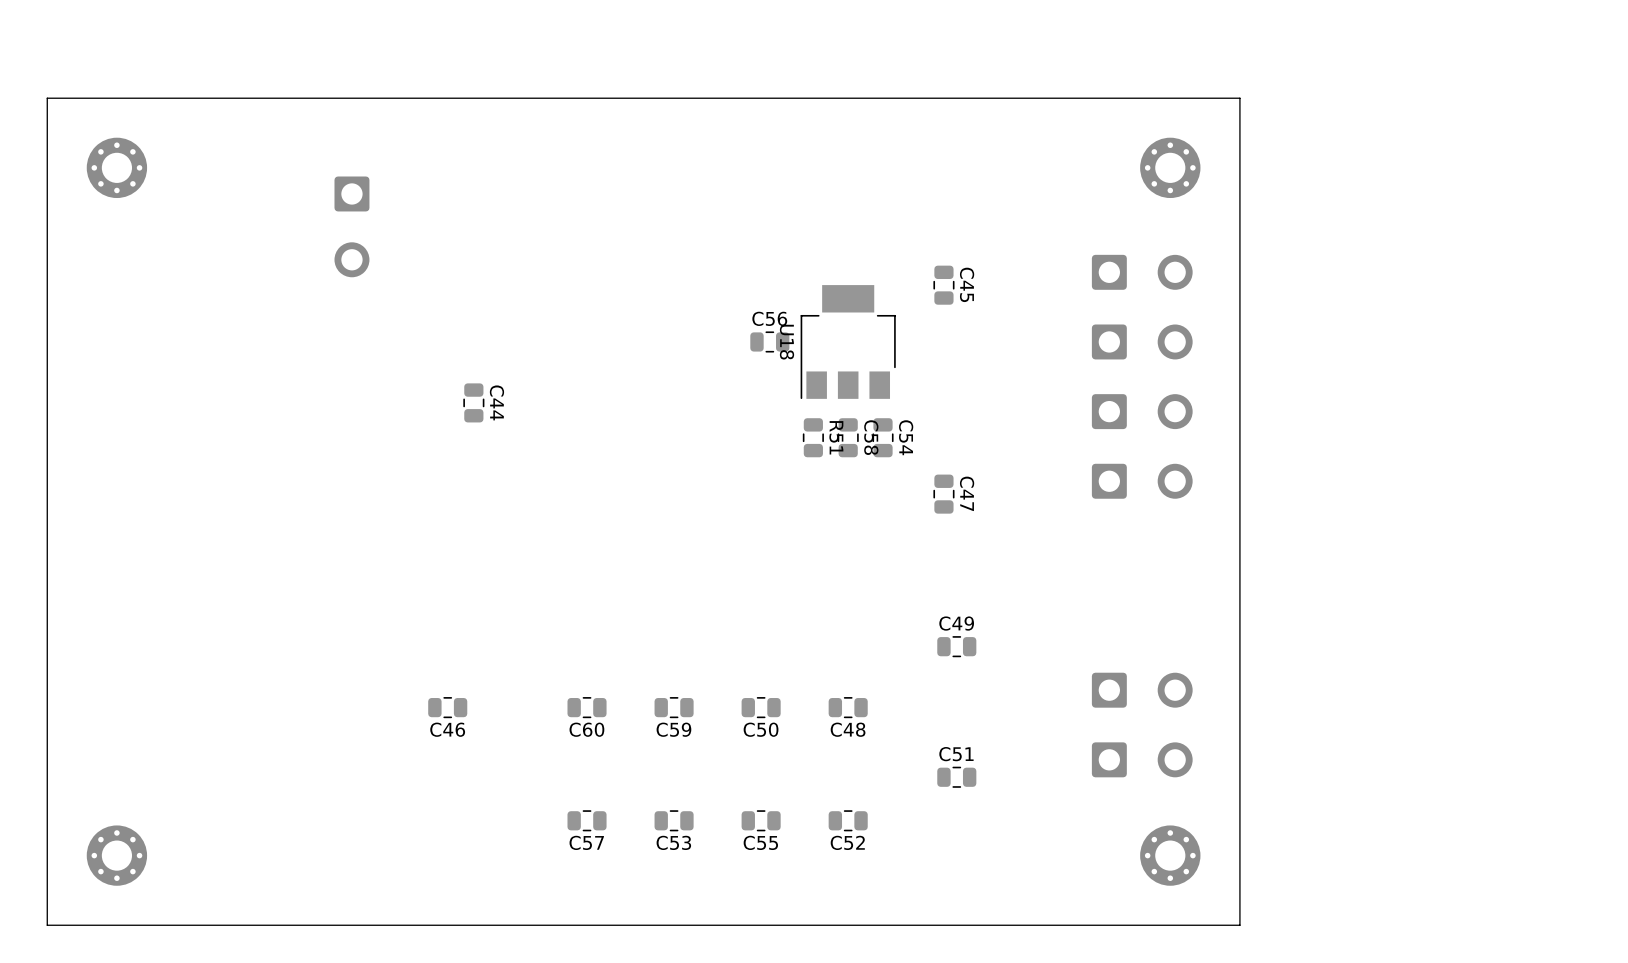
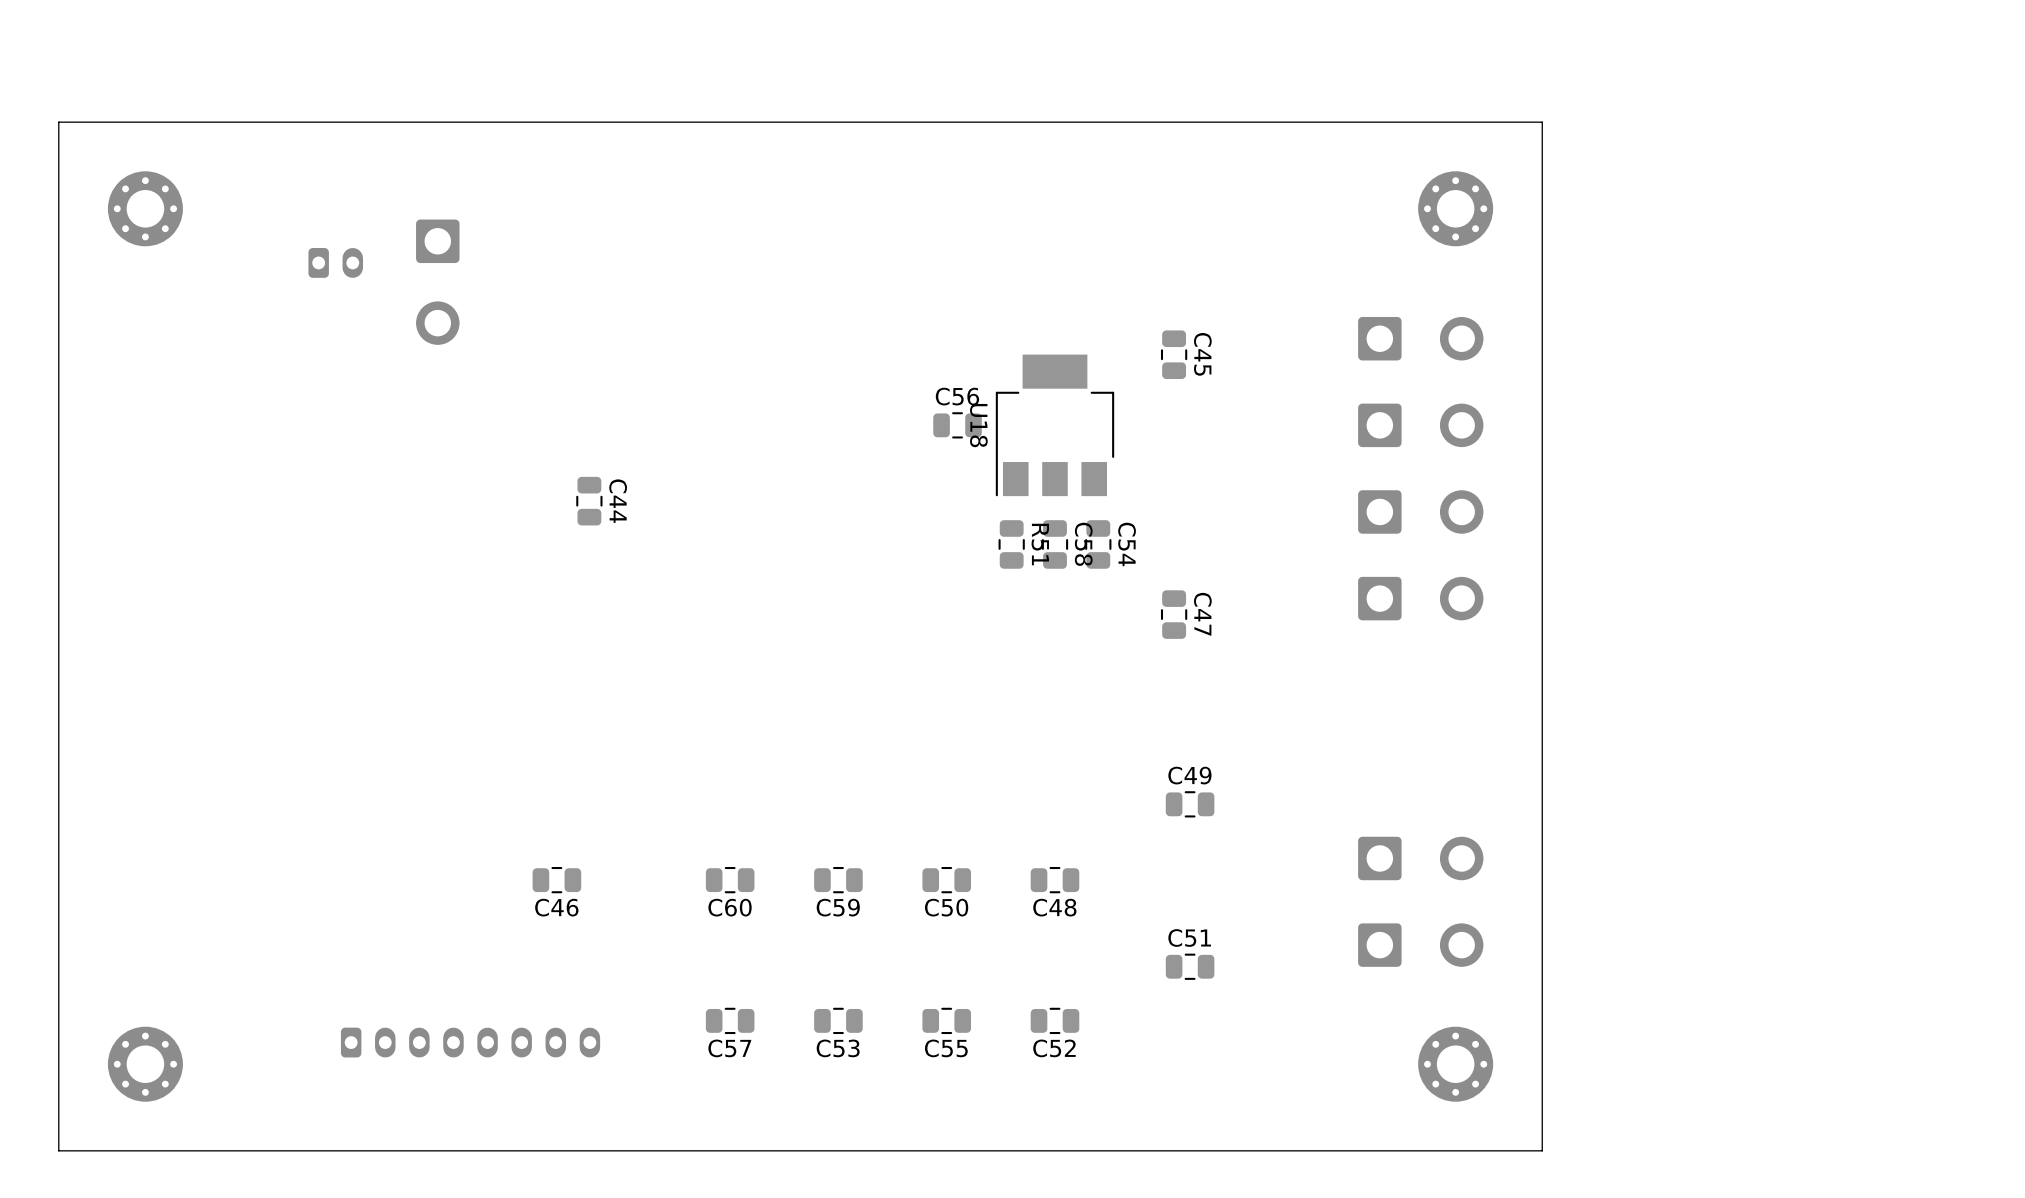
part: none -> (335, 262)
part: none -> (470, 1042)

